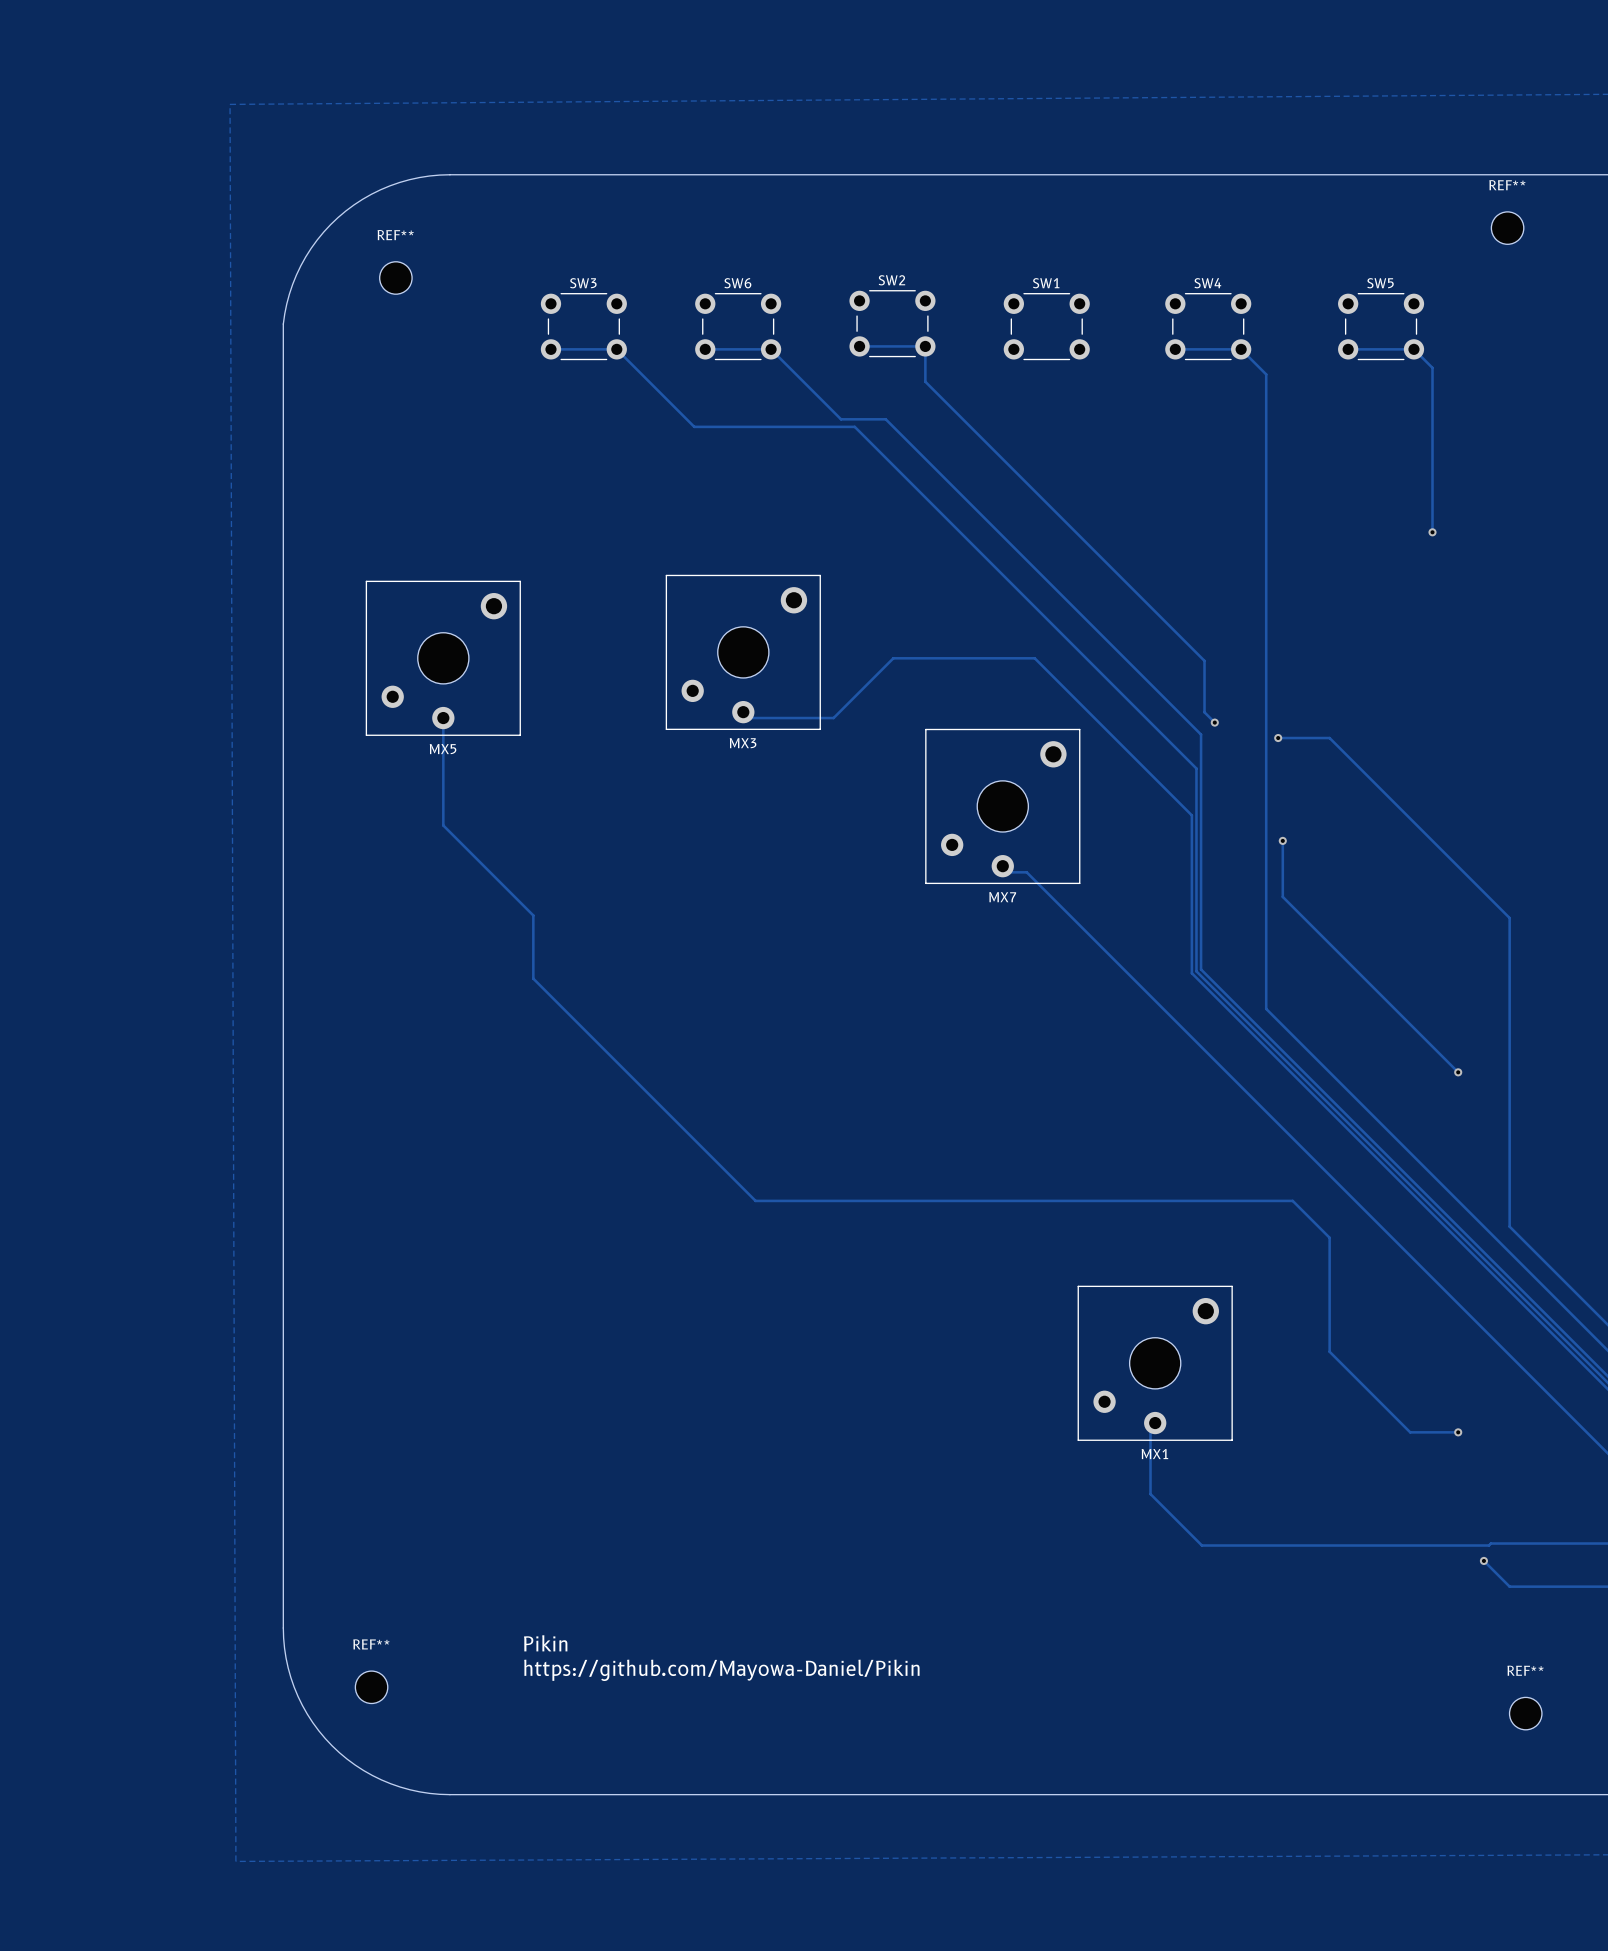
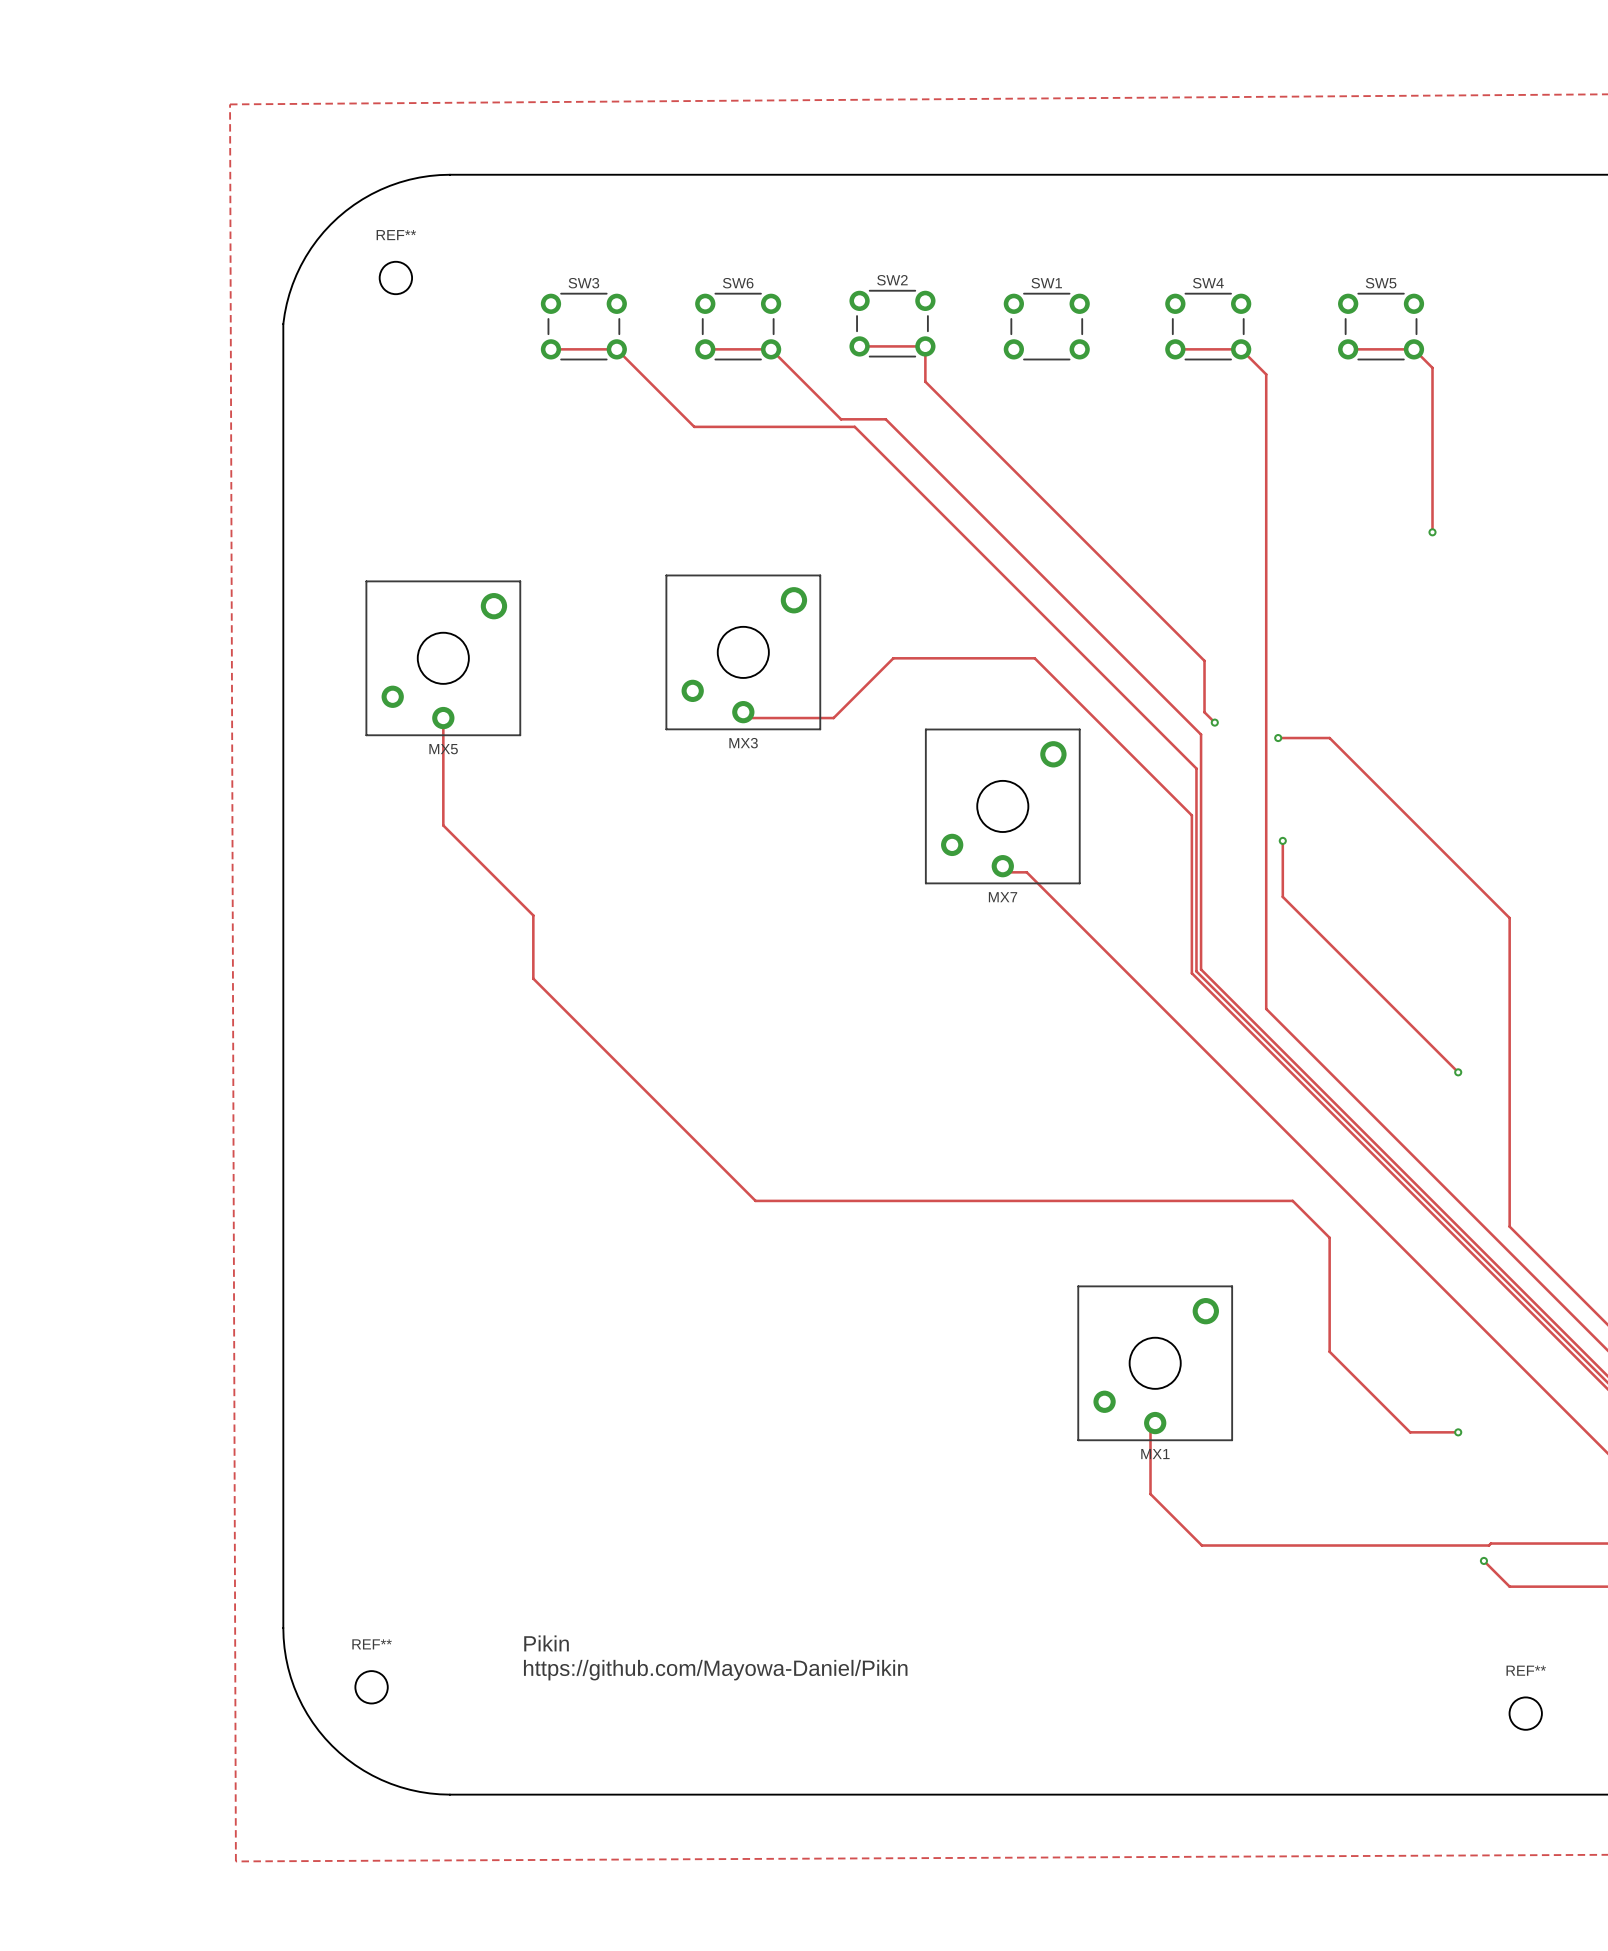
REF**: (1507, 228) -> none

